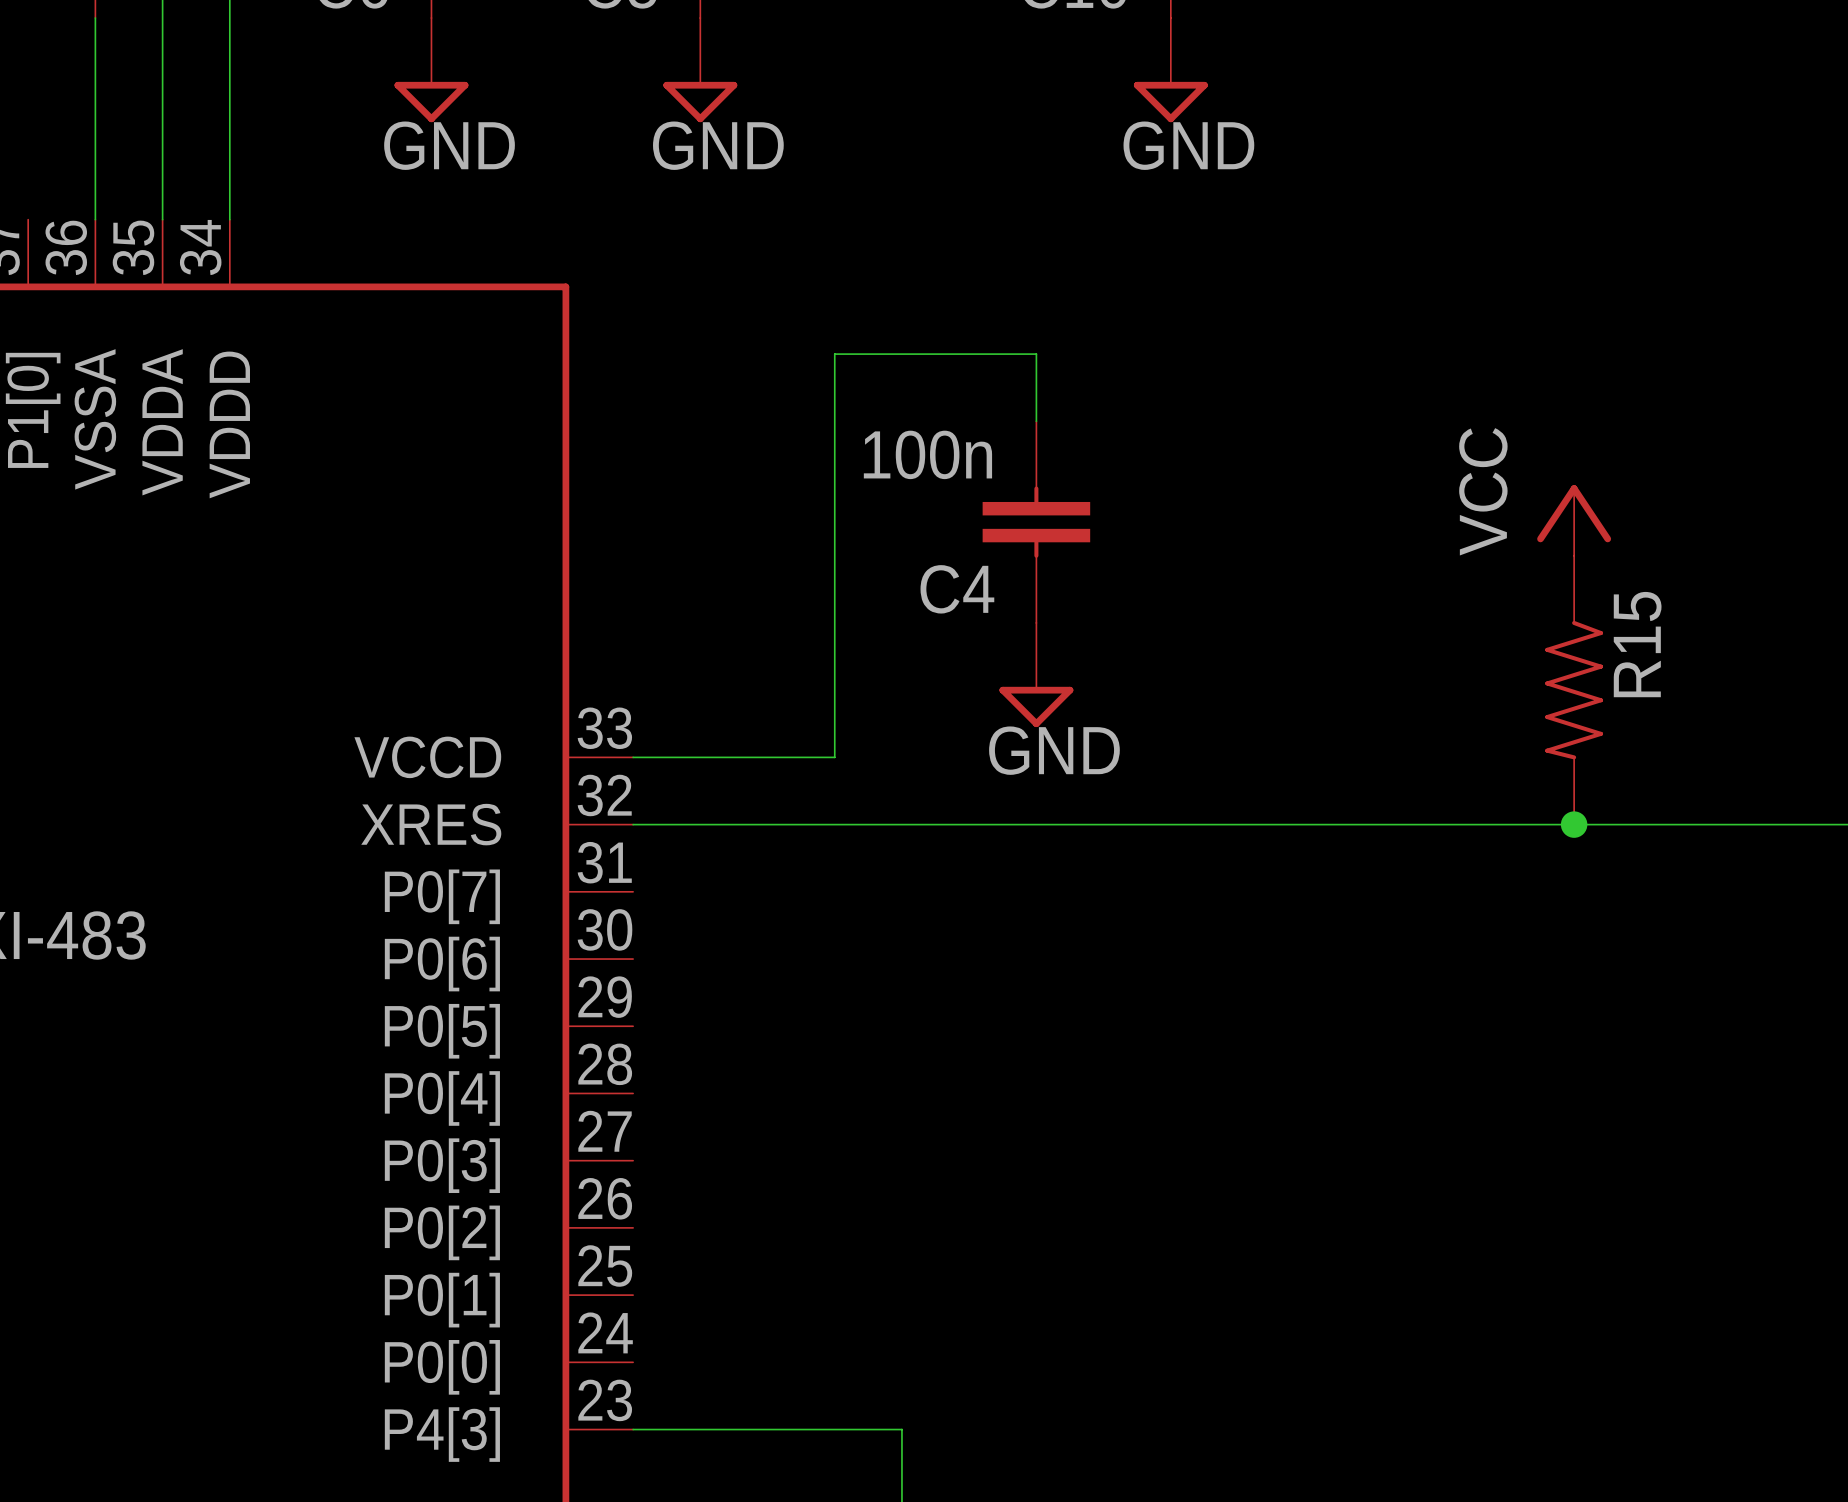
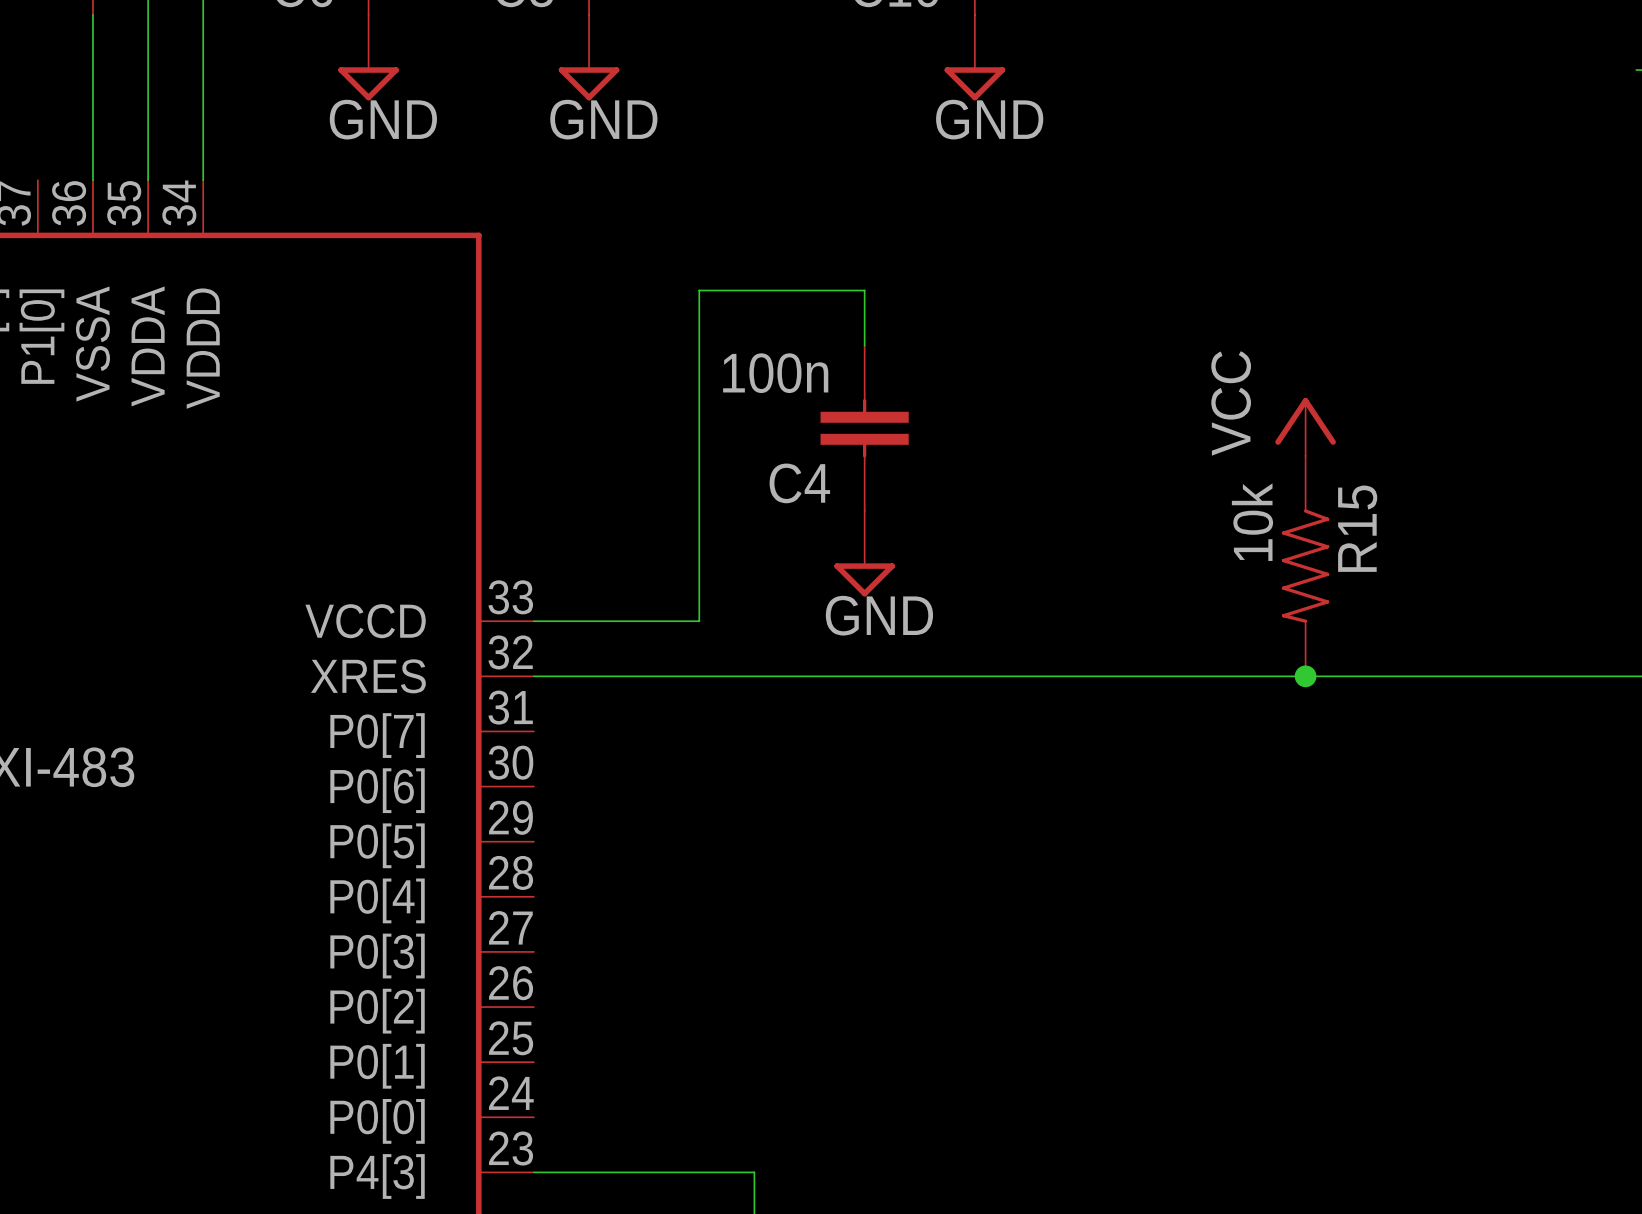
R15 value: none -> 10k (1252, 522)

